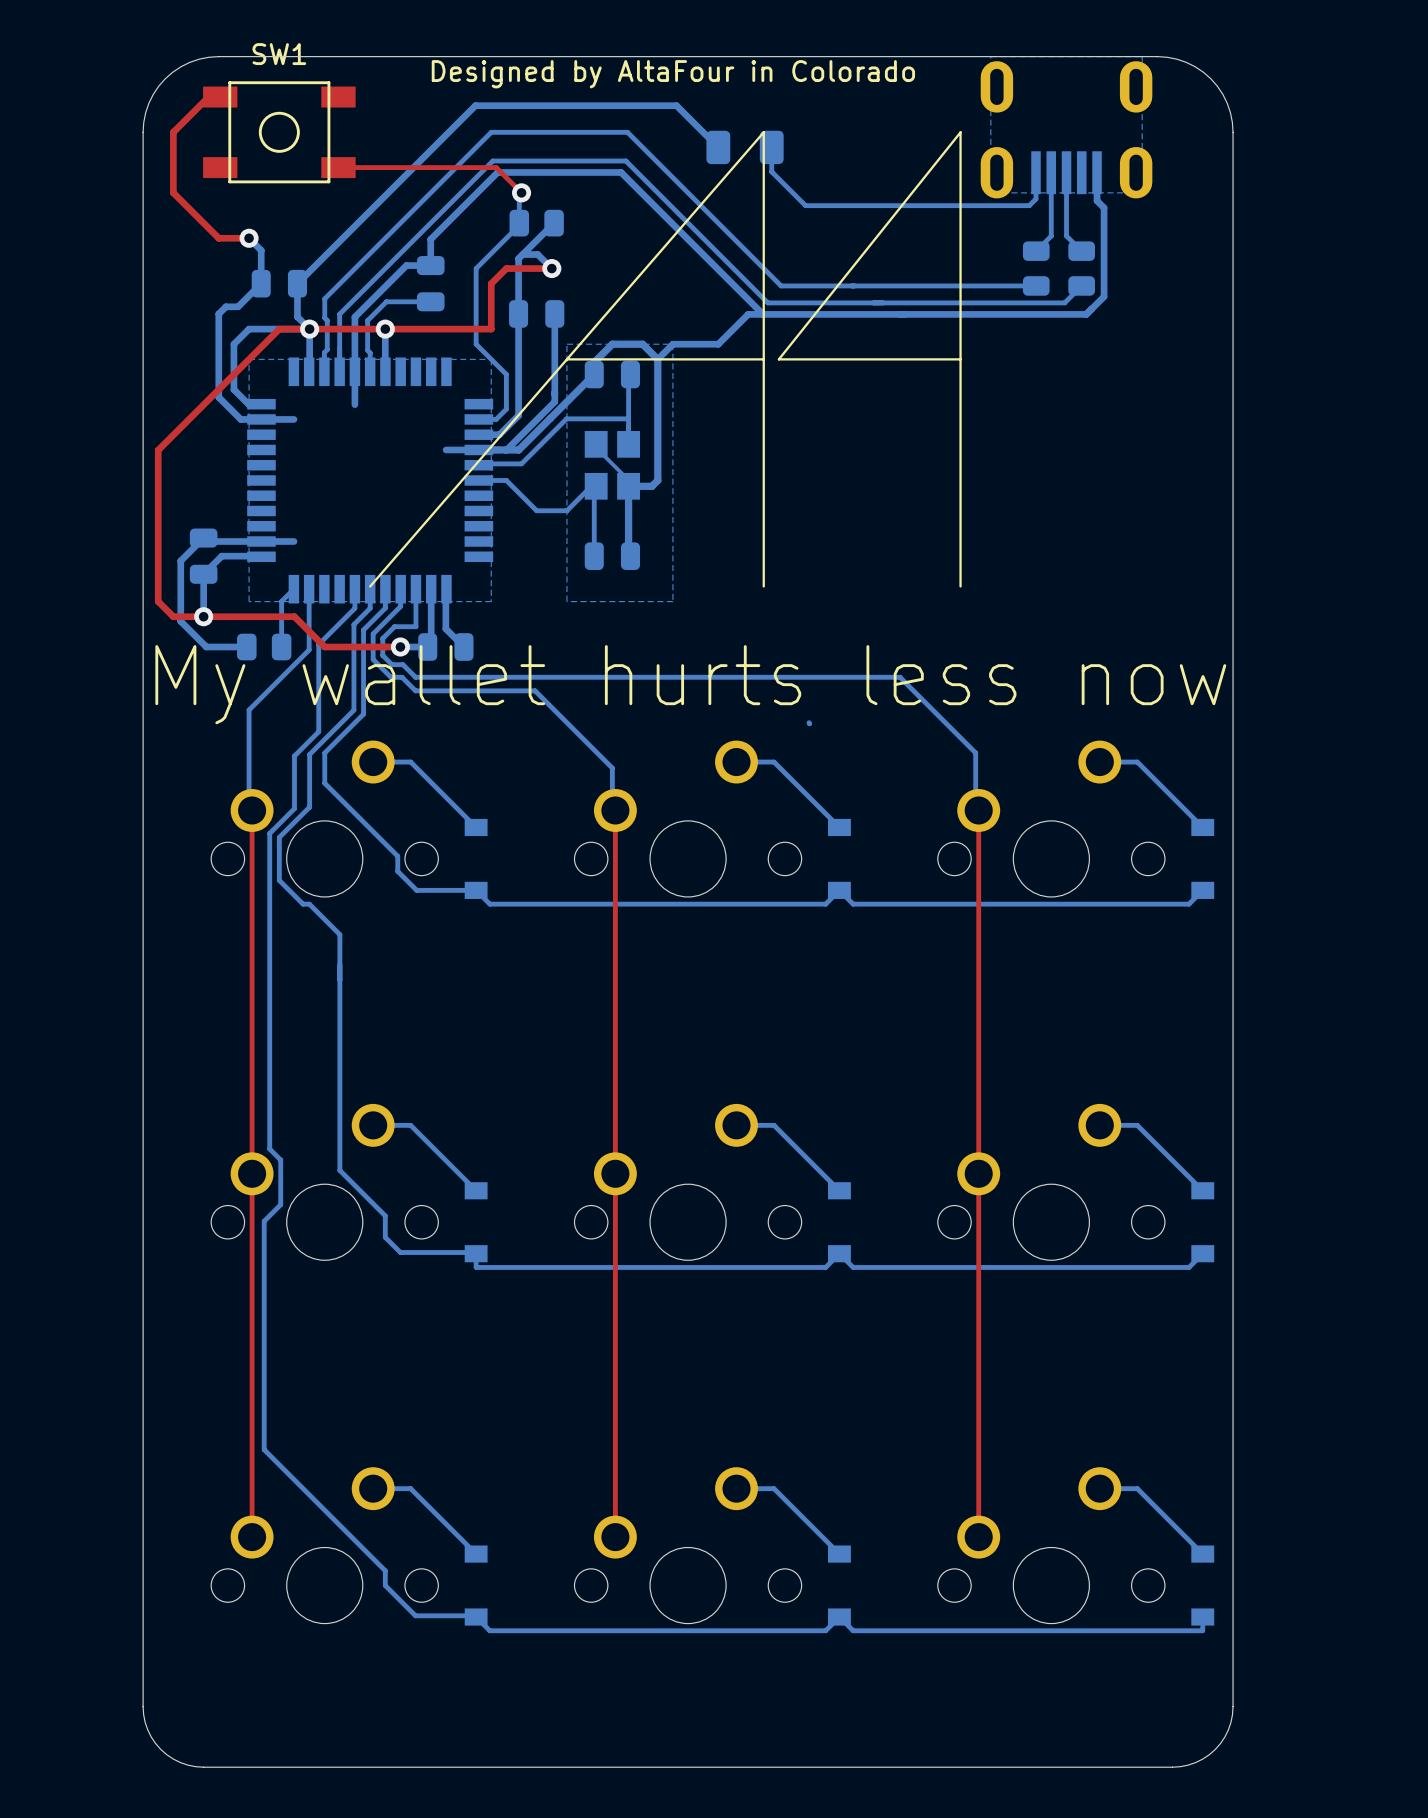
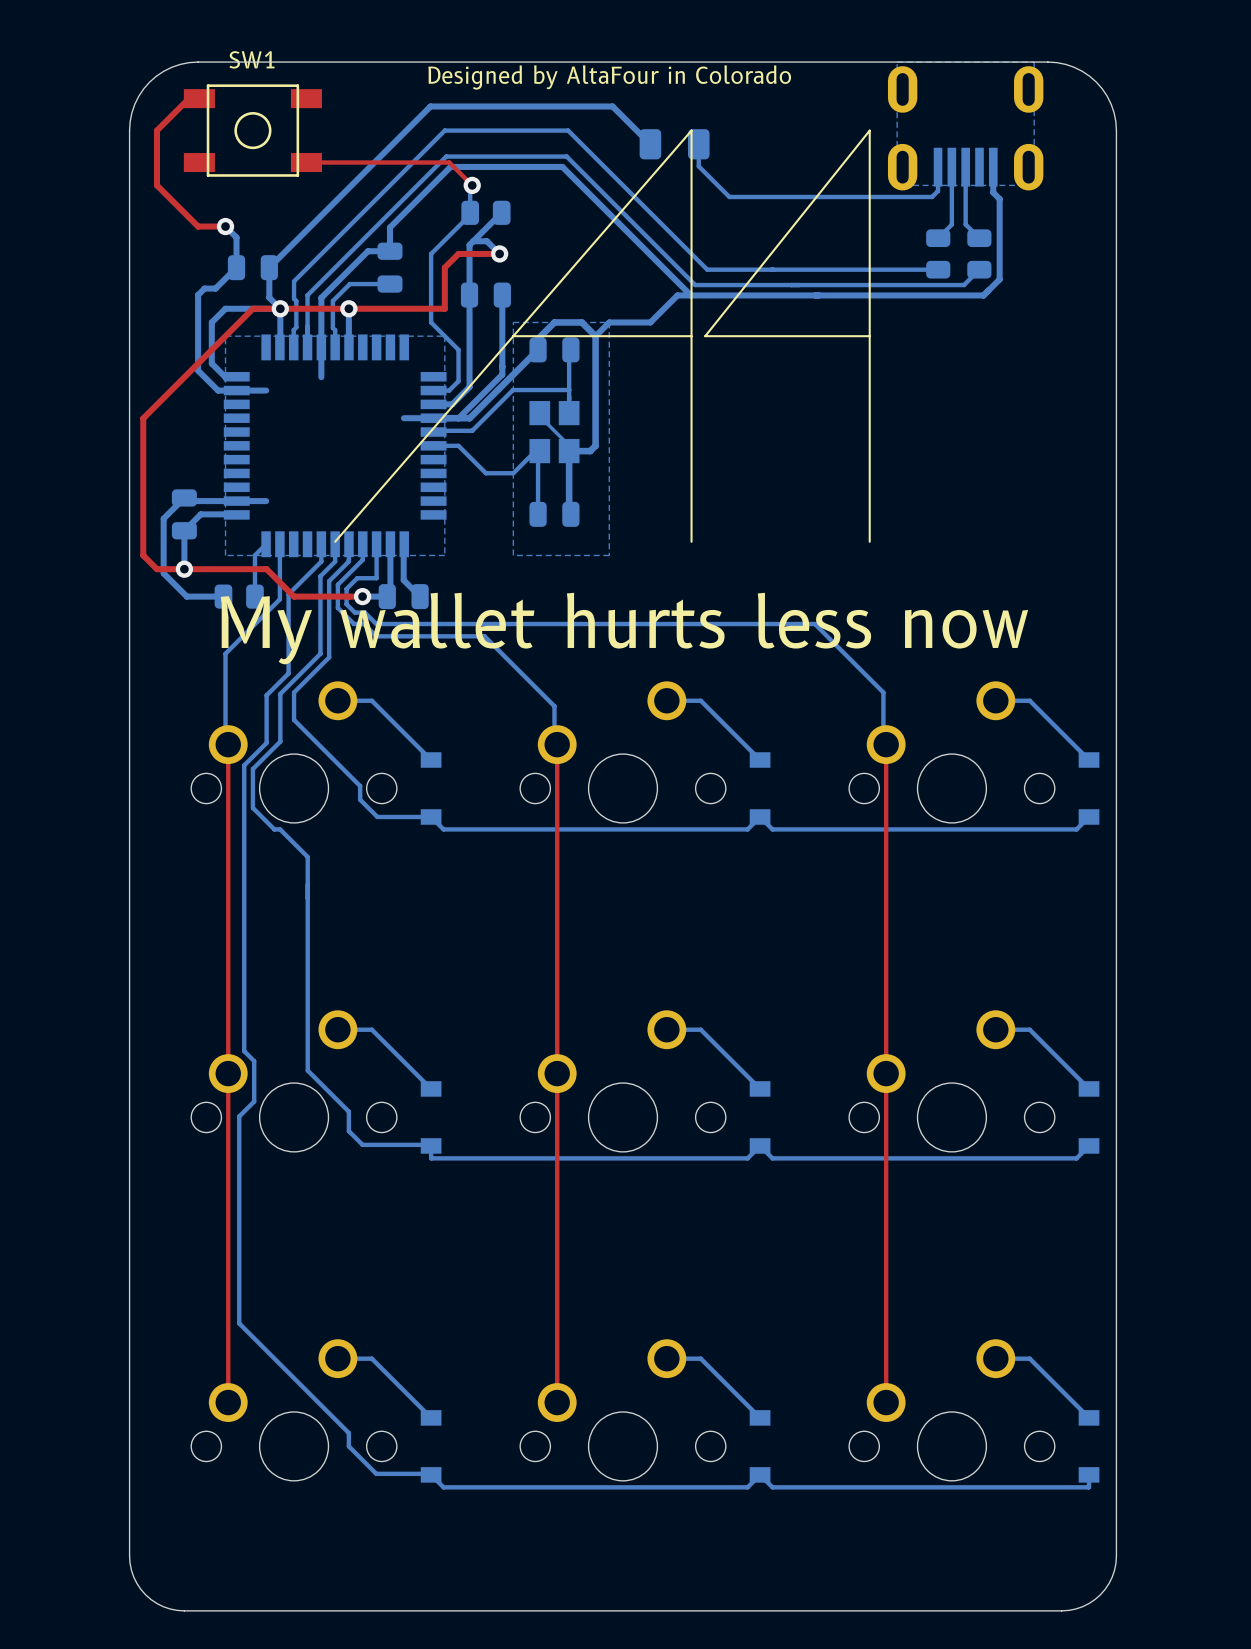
bottom track: (809, 722) (809, 723) -> none

